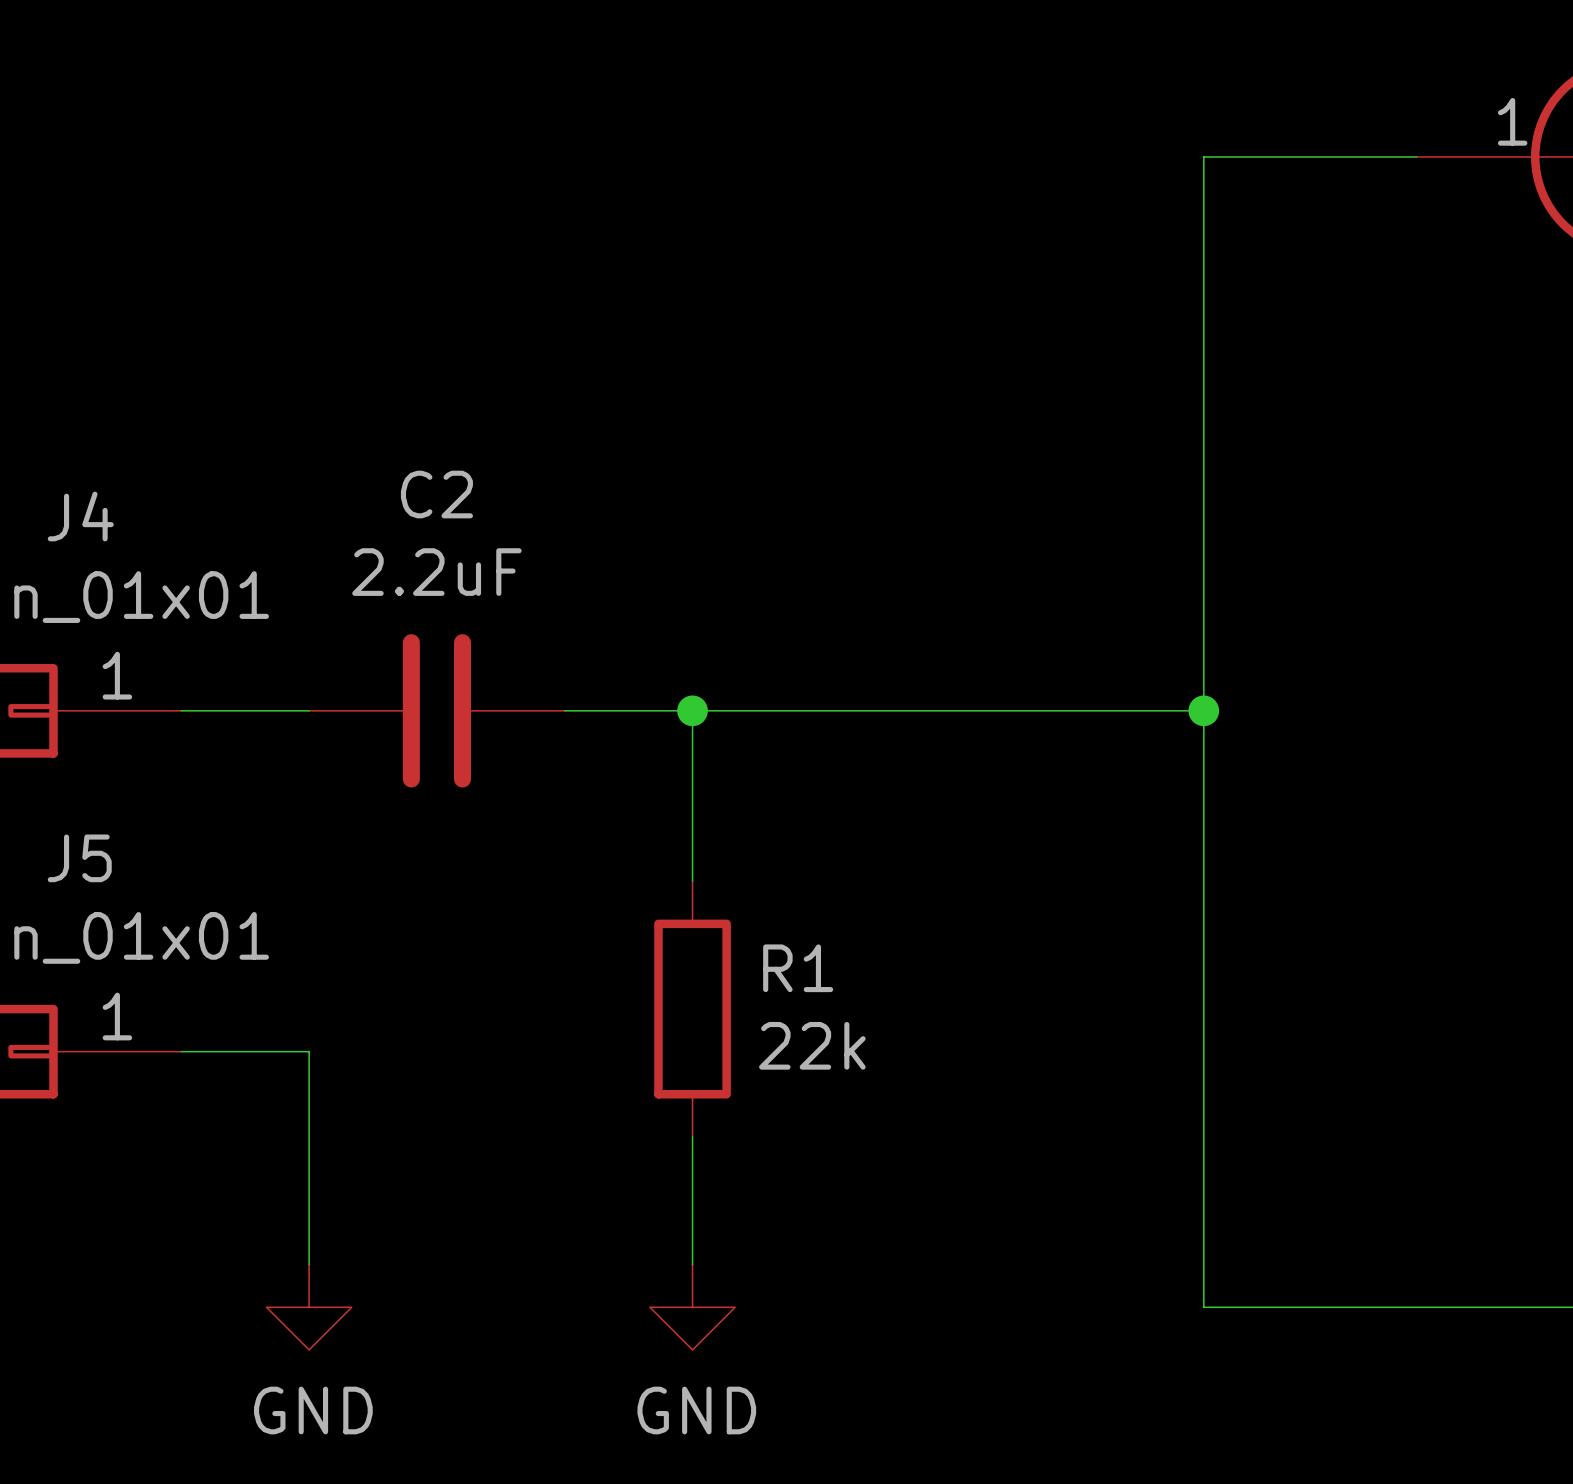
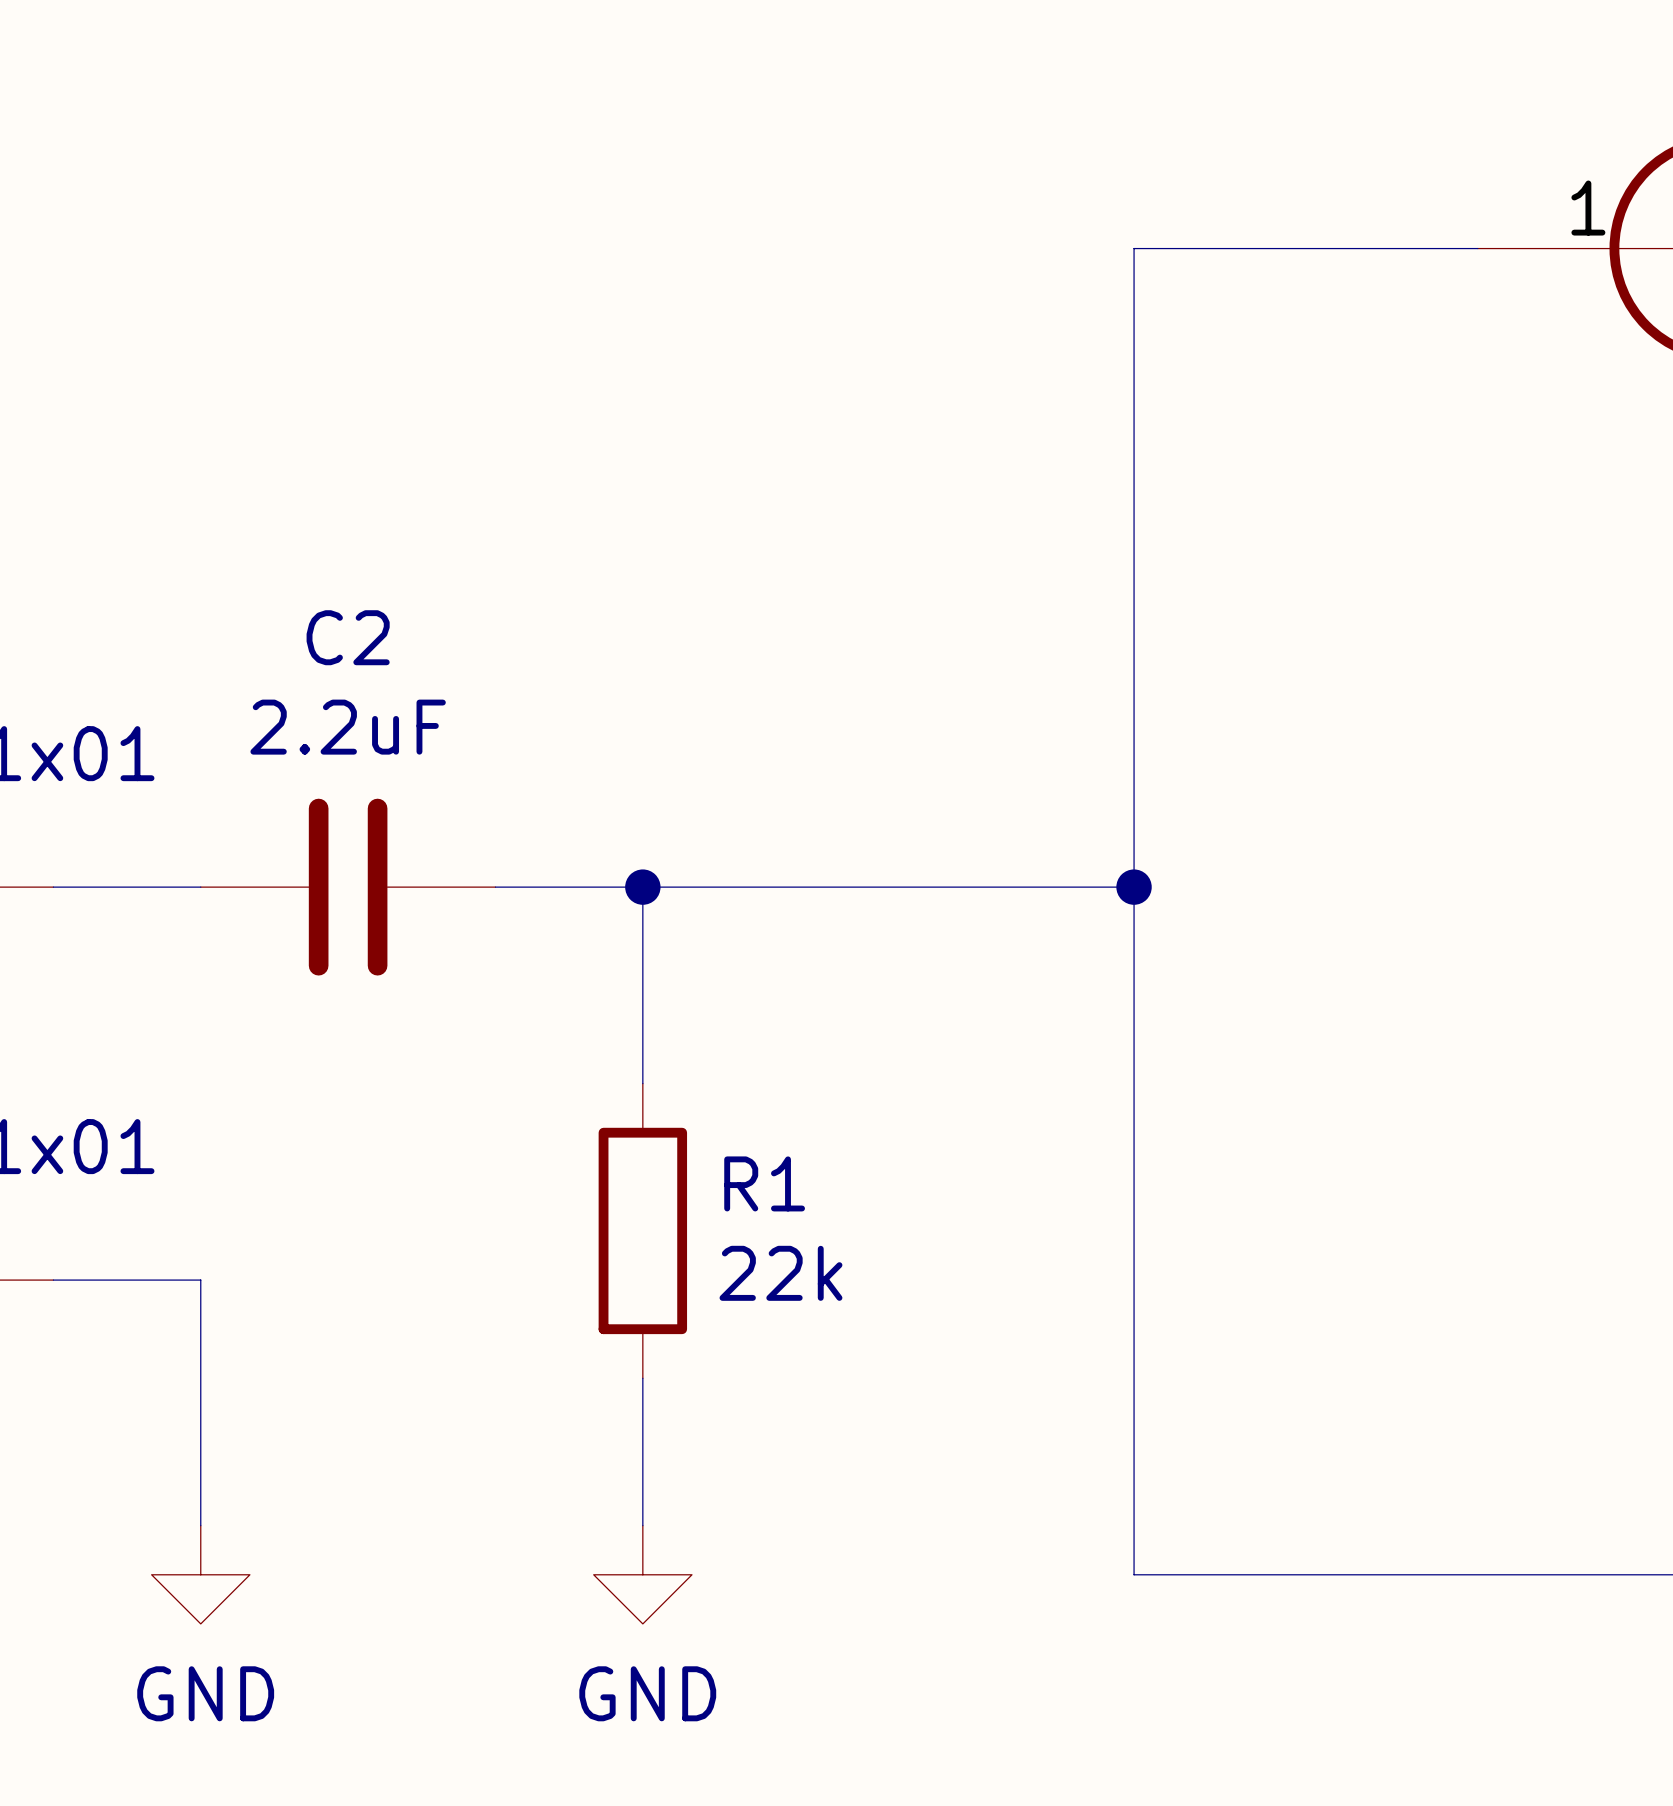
wire: (1203, 156) (1203, 1307) -> (1232, 248) (1134, 248) (1134, 1574) (1232, 1574)
wire: (1118, 710) (1203, 710) -> none
junction position: (1203, 710) -> (1134, 887)

